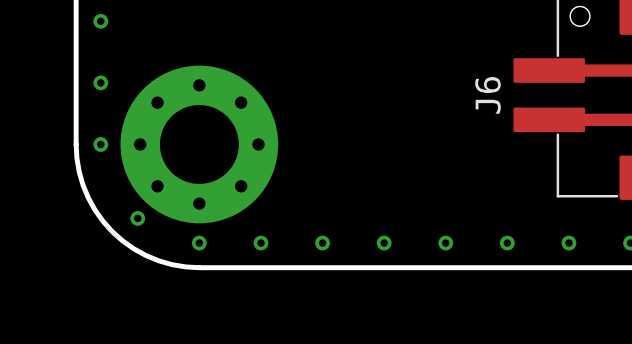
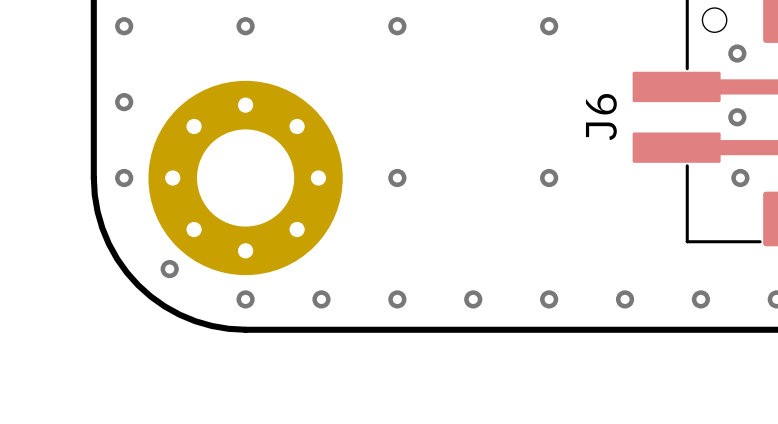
via: none -> (245, 26)
via: none -> (397, 26)
via: none -> (549, 26)
via: none -> (737, 53)
via: none -> (737, 117)
via: none -> (397, 177)
via: none -> (549, 177)
via: none -> (740, 177)

